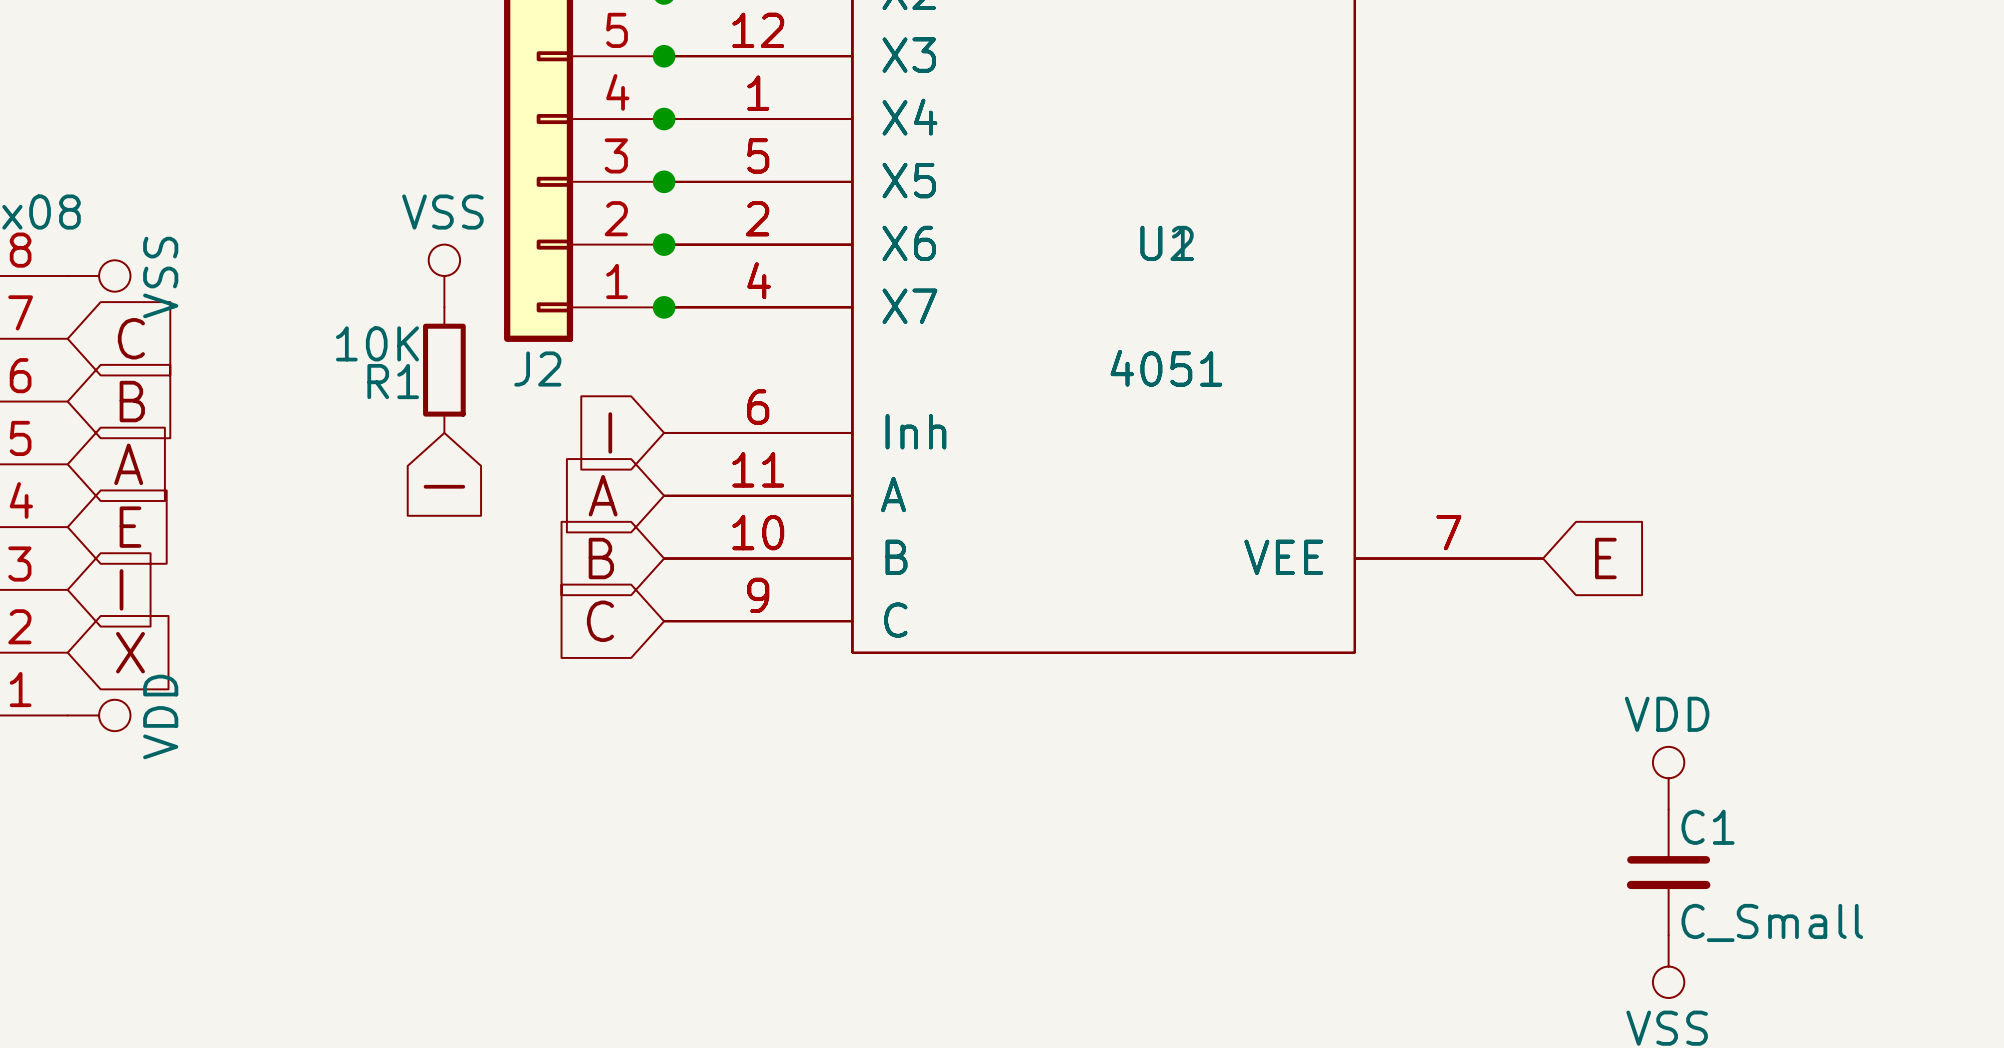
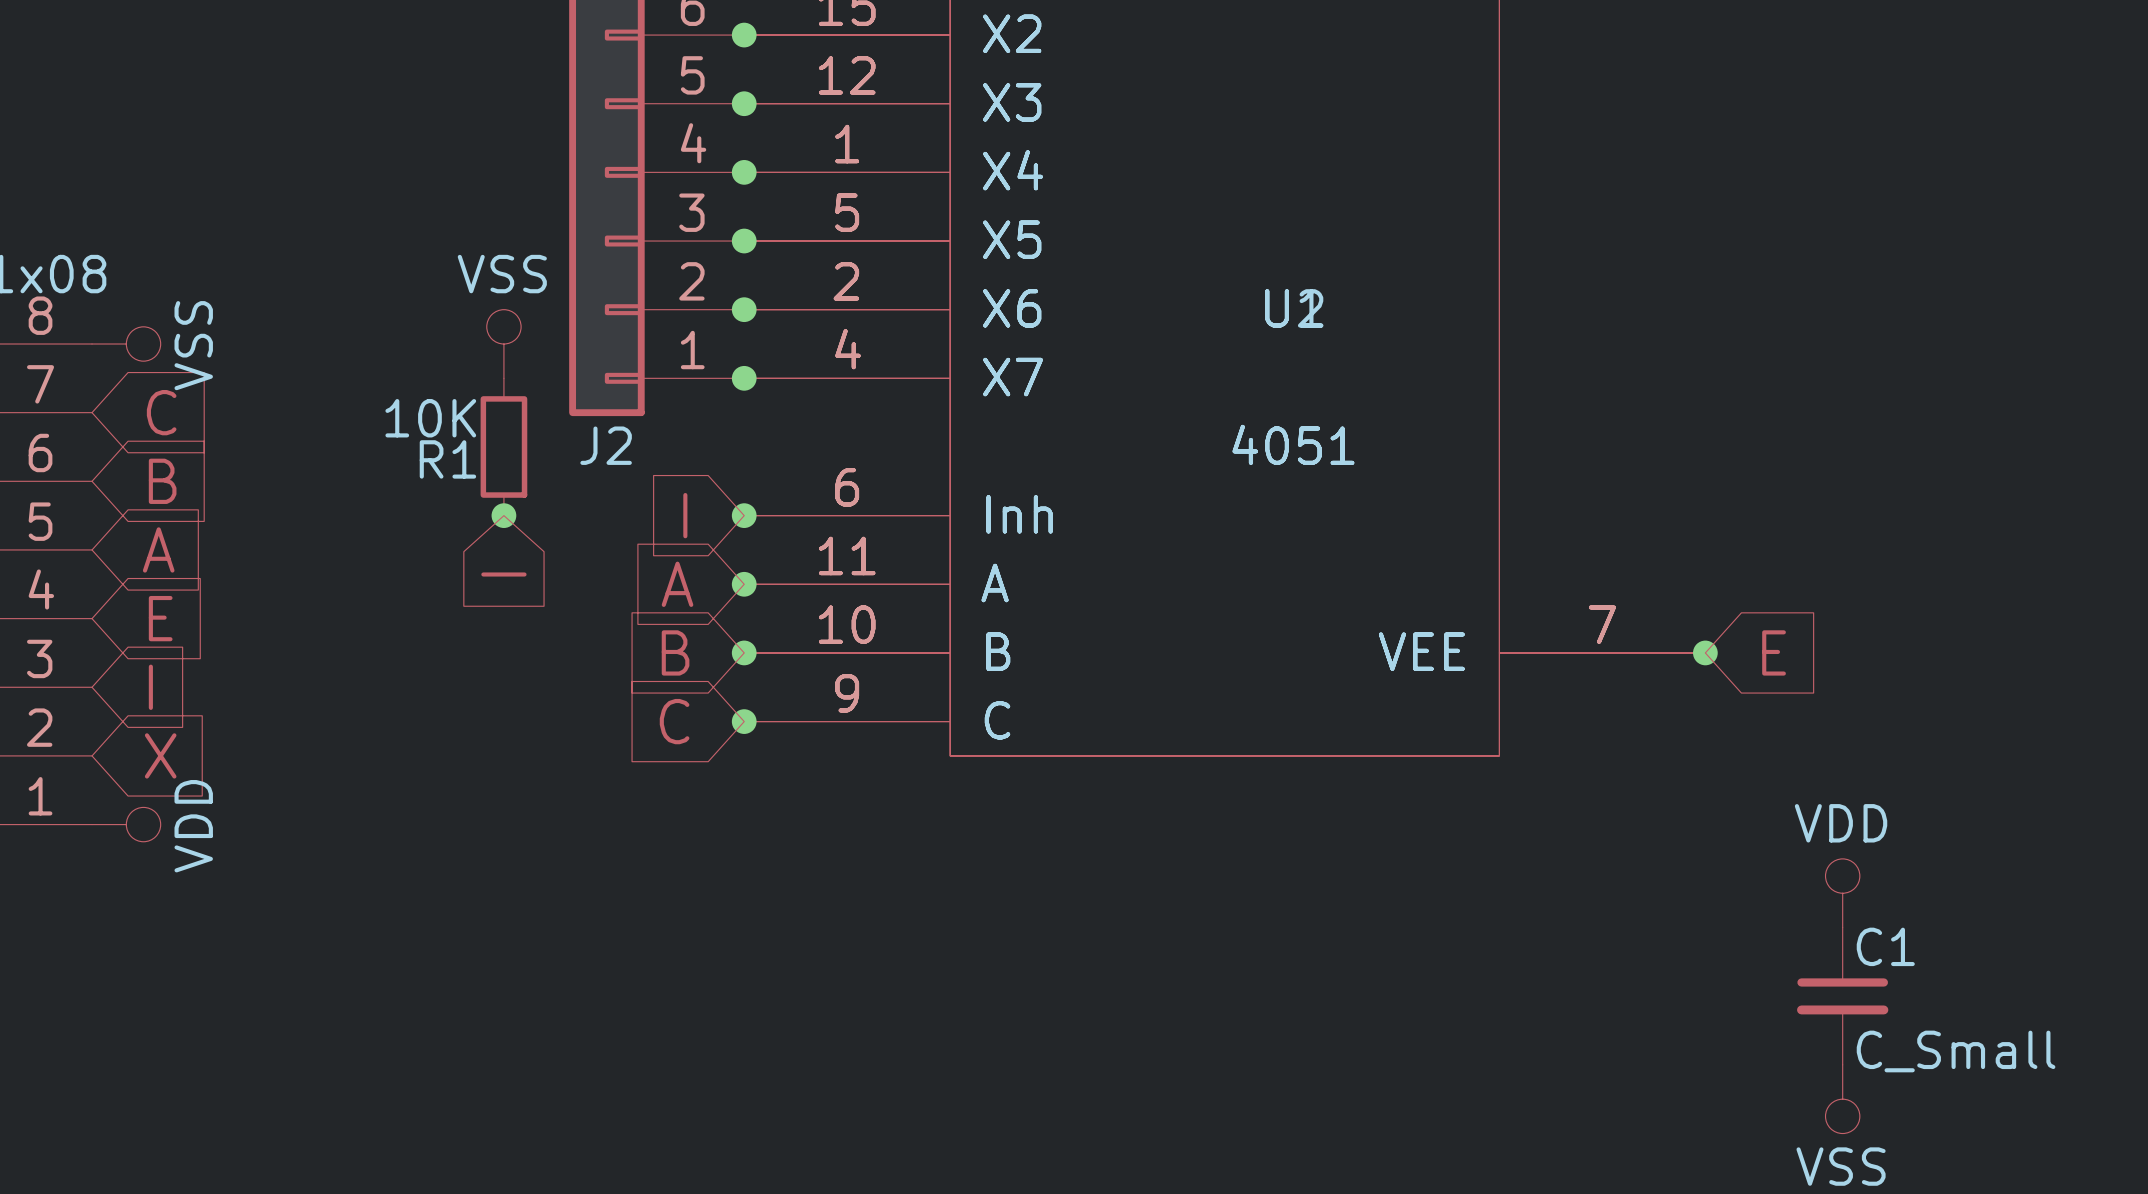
junction: none -> (503, 515)
junction: none -> (744, 515)
junction: none -> (744, 584)
junction: none -> (744, 652)
junction: none -> (1705, 652)
junction: none -> (744, 721)

